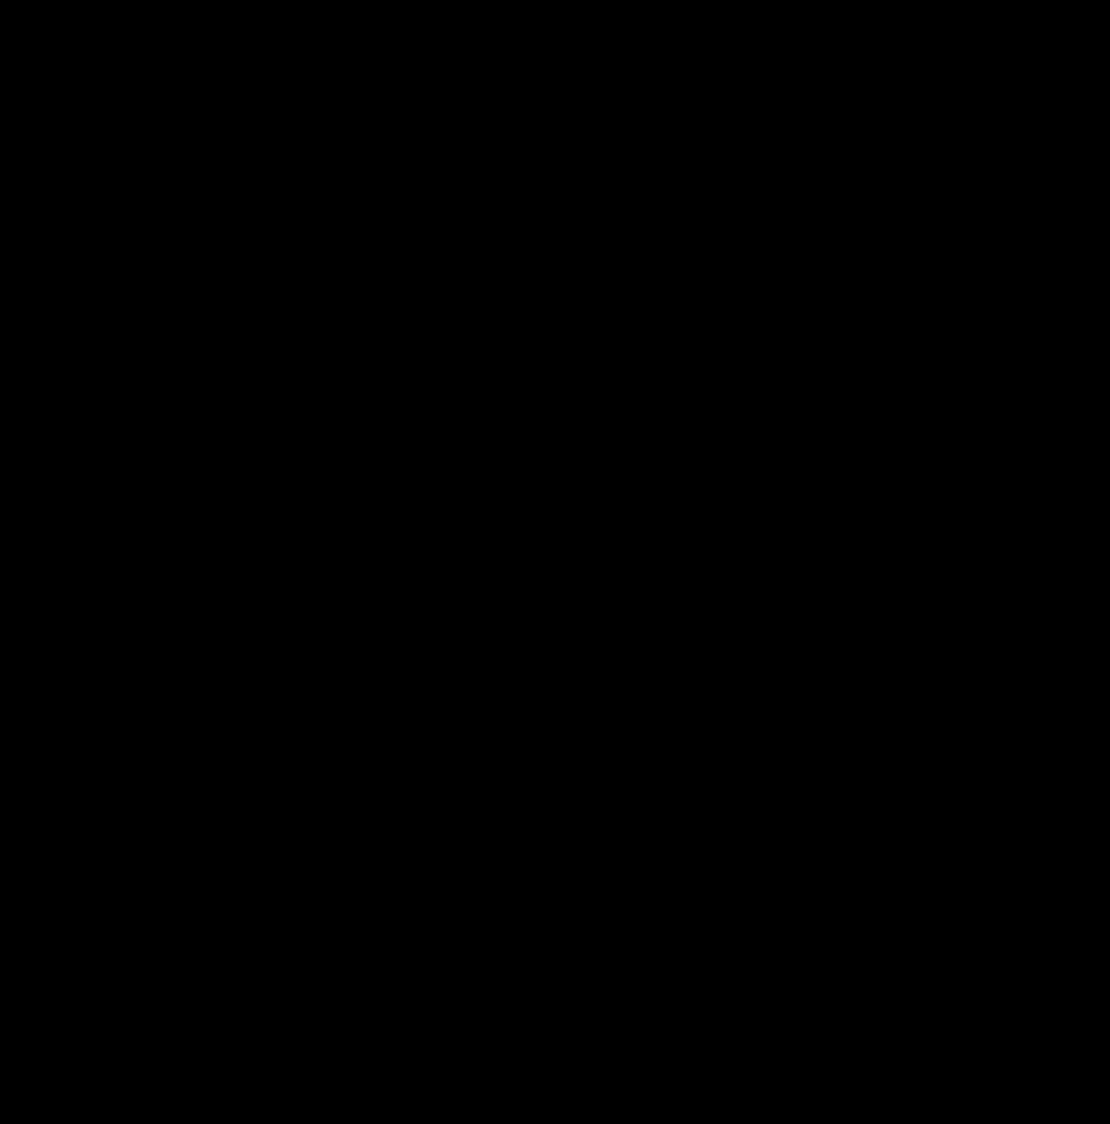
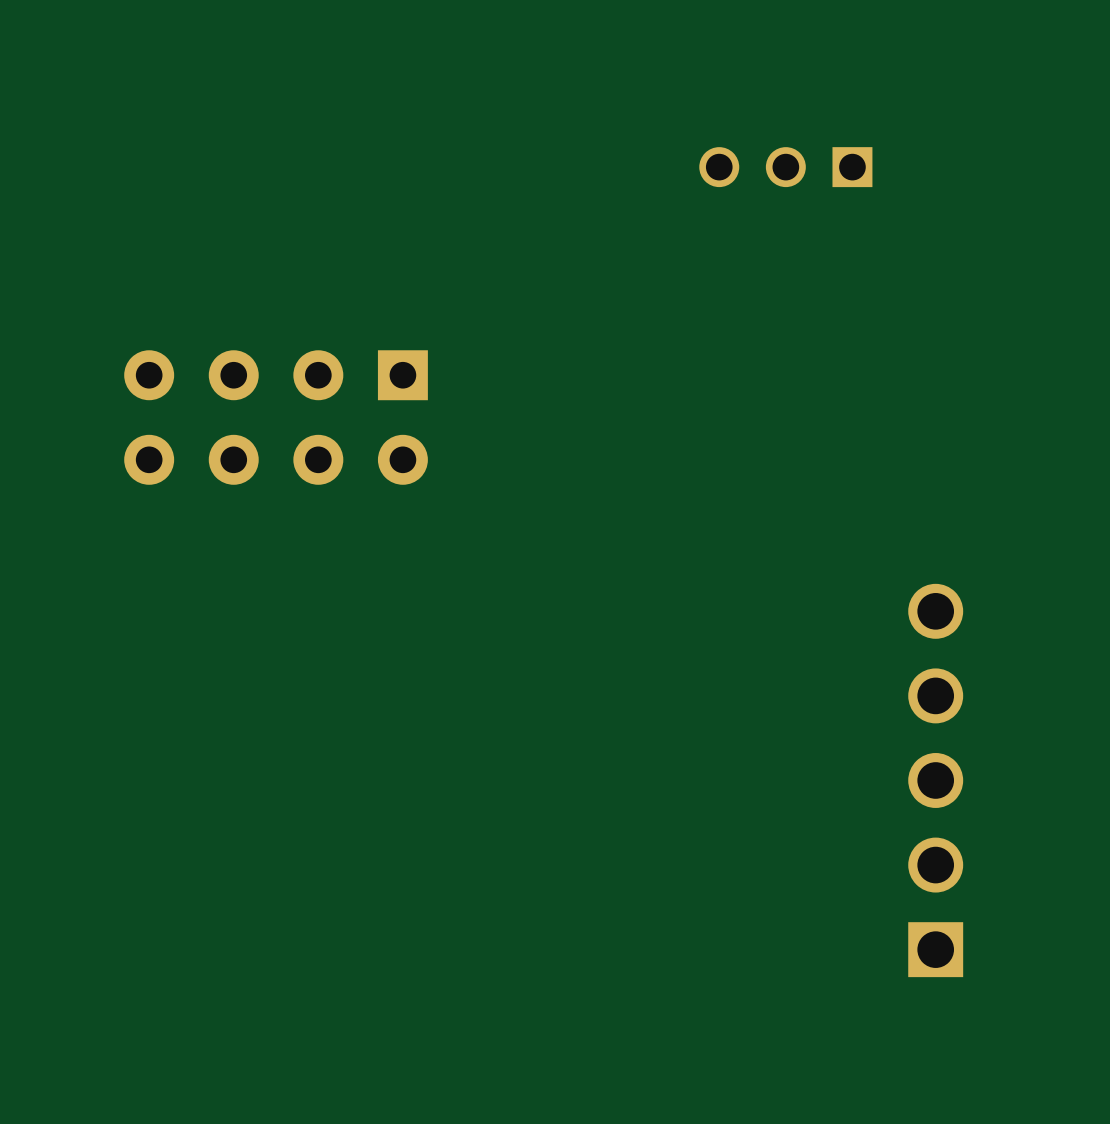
part: none -> (785, 167)
part: none -> (276, 417)
part: none -> (935, 780)

